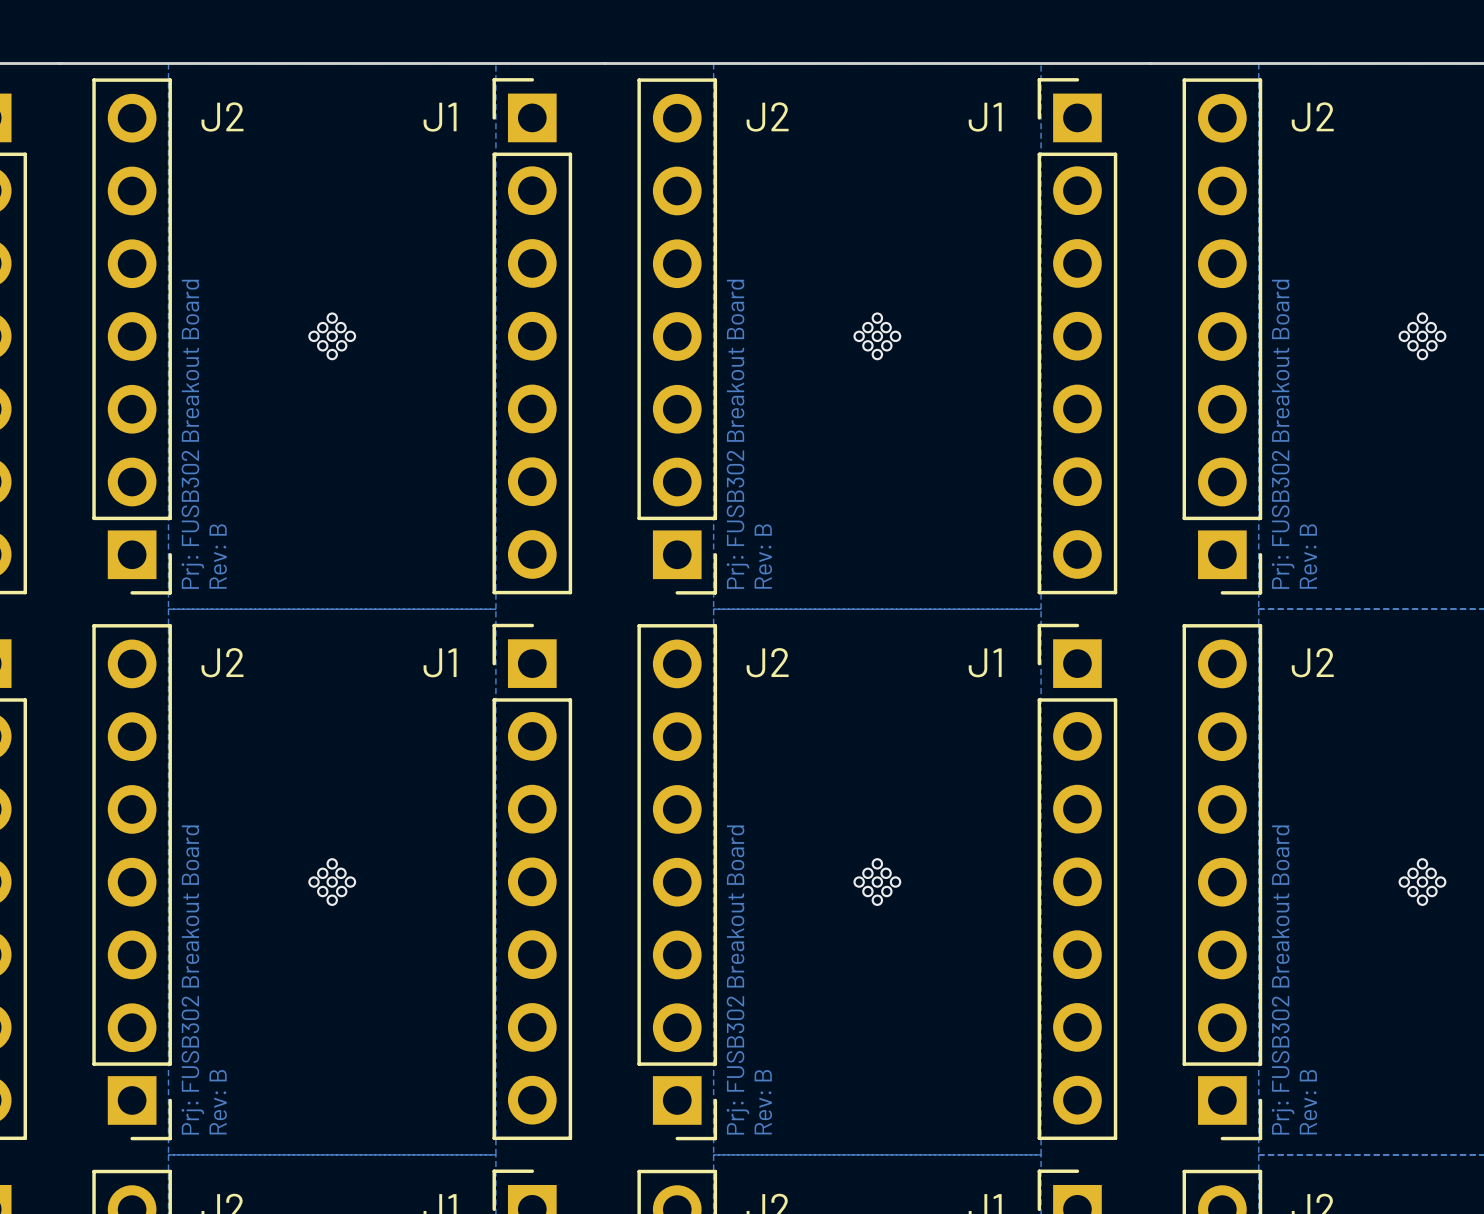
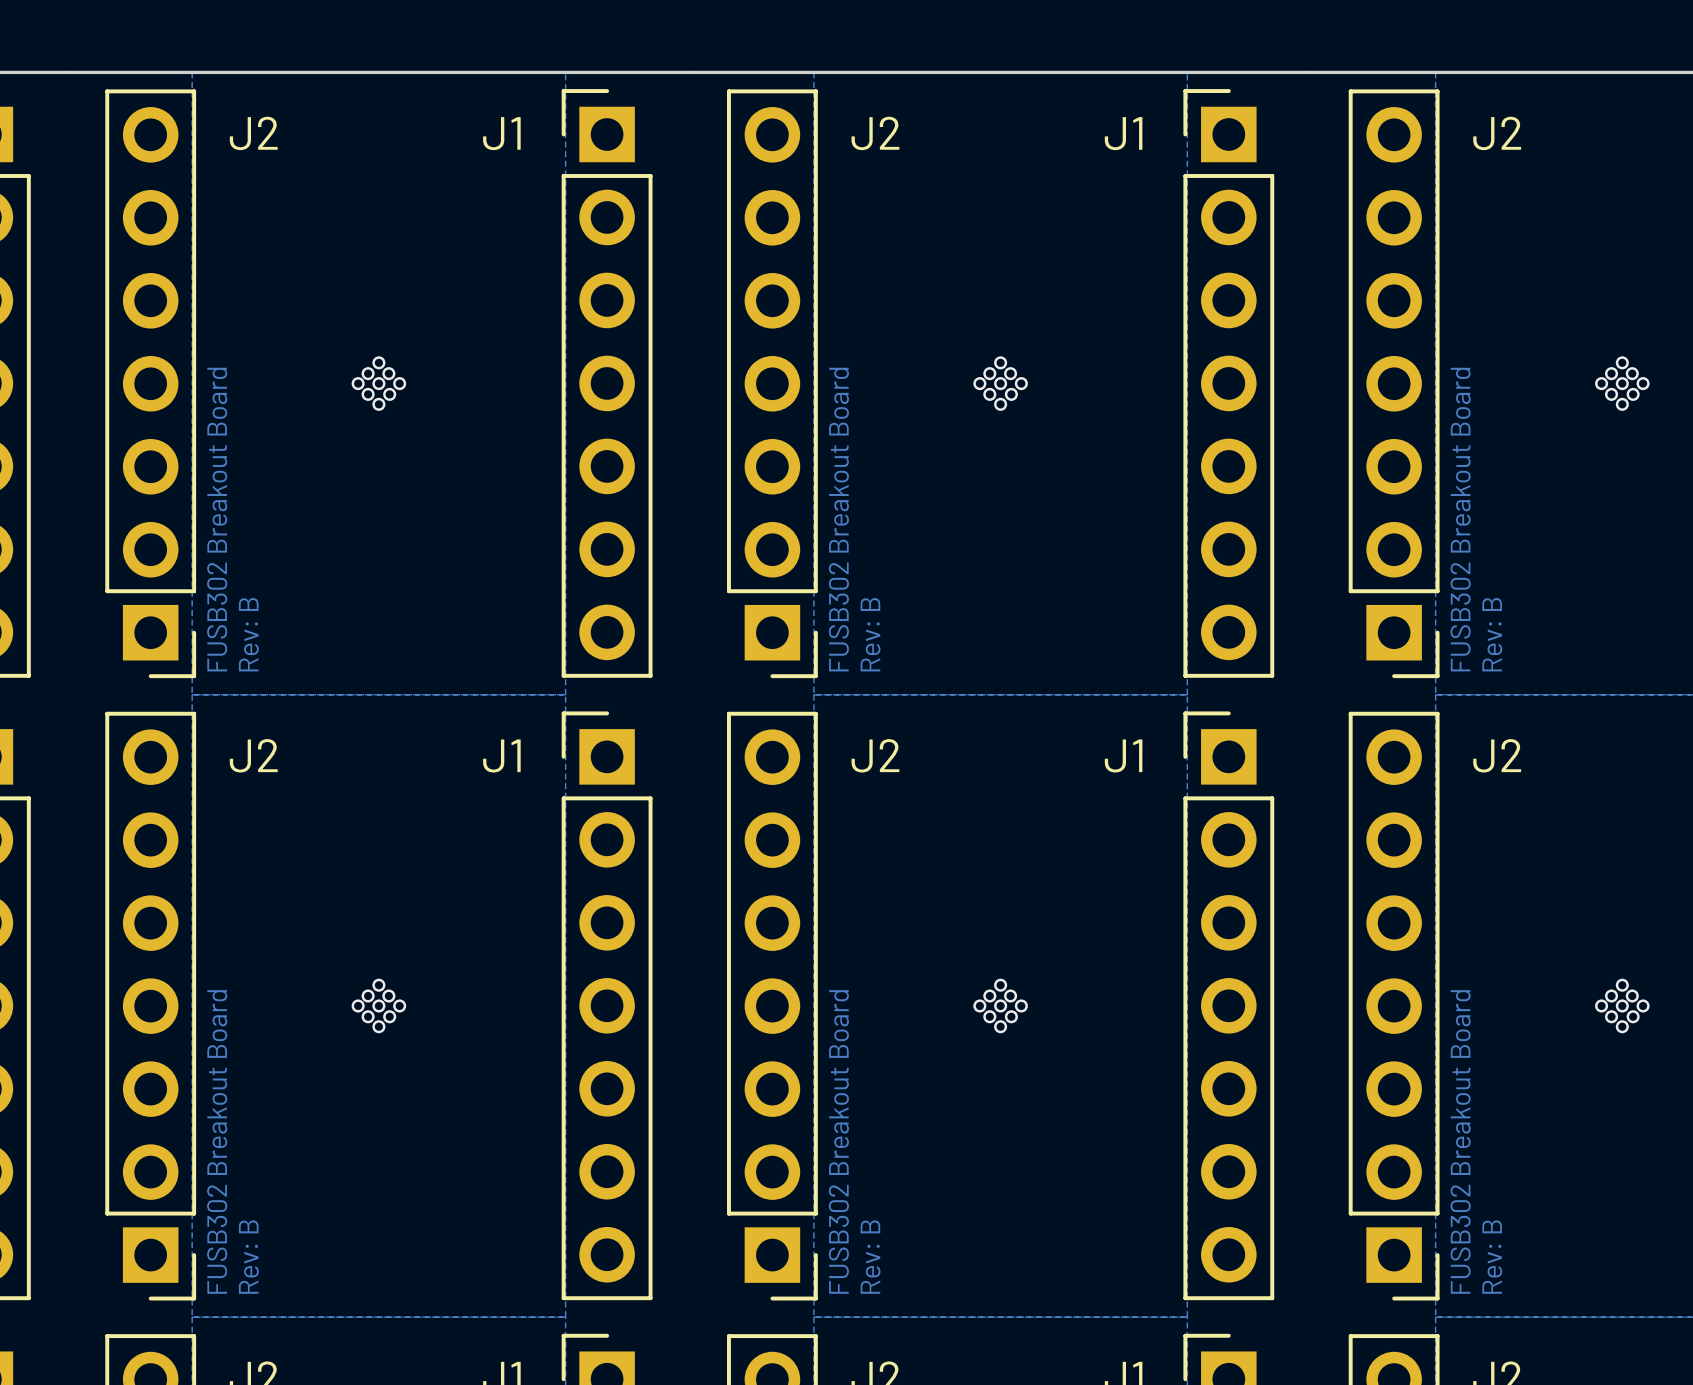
text: Prj: FUSB302 Breakout Board (192, 434) -> FUSB302 Breakout Board (217, 519)
text: Prj: FUSB302 Breakout Board (737, 434) -> FUSB302 Breakout Board (838, 519)
text: Prj: FUSB302 Breakout Board (1283, 434) -> FUSB302 Breakout Board (1460, 519)
text: Prj: FUSB302 Breakout Board (192, 980) -> FUSB302 Breakout Board (217, 1141)
text: Prj: FUSB302 Breakout Board (737, 980) -> FUSB302 Breakout Board (838, 1141)
text: Prj: FUSB302 Breakout Board (1283, 980) -> FUSB302 Breakout Board (1460, 1141)

